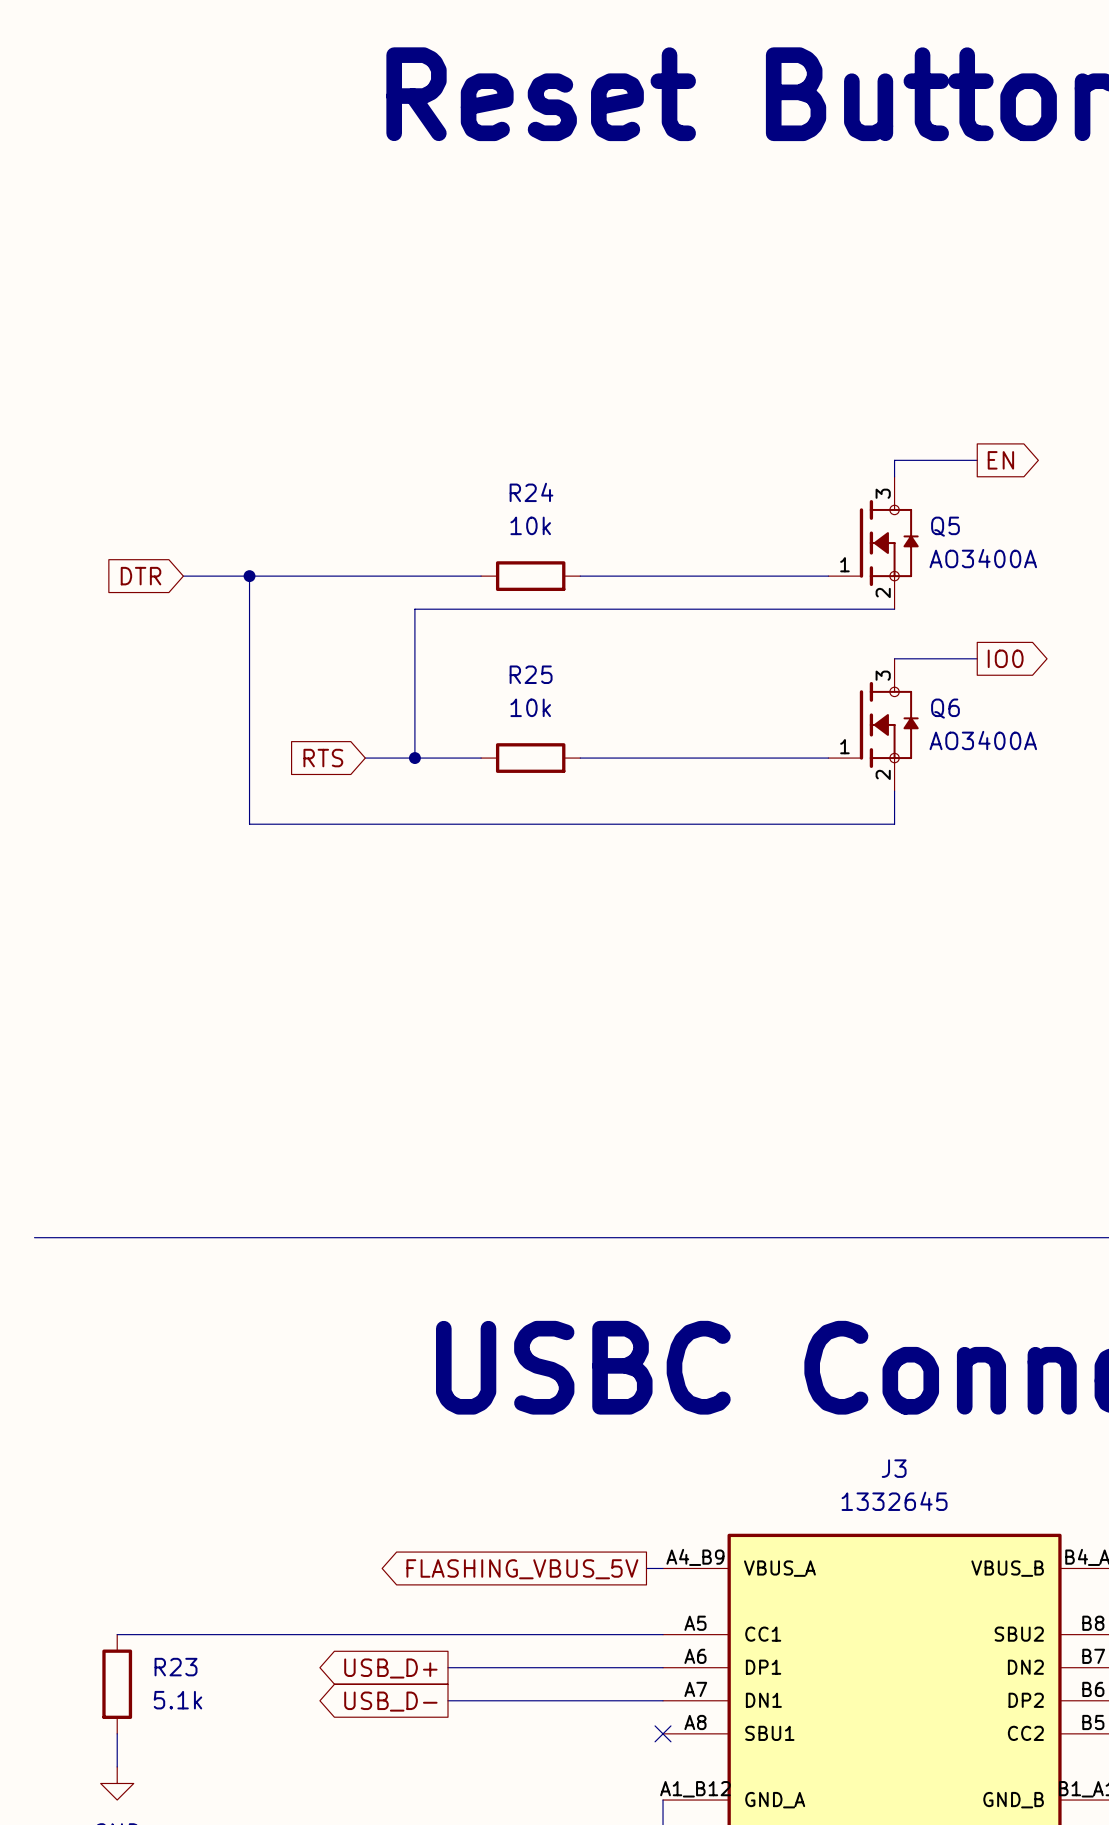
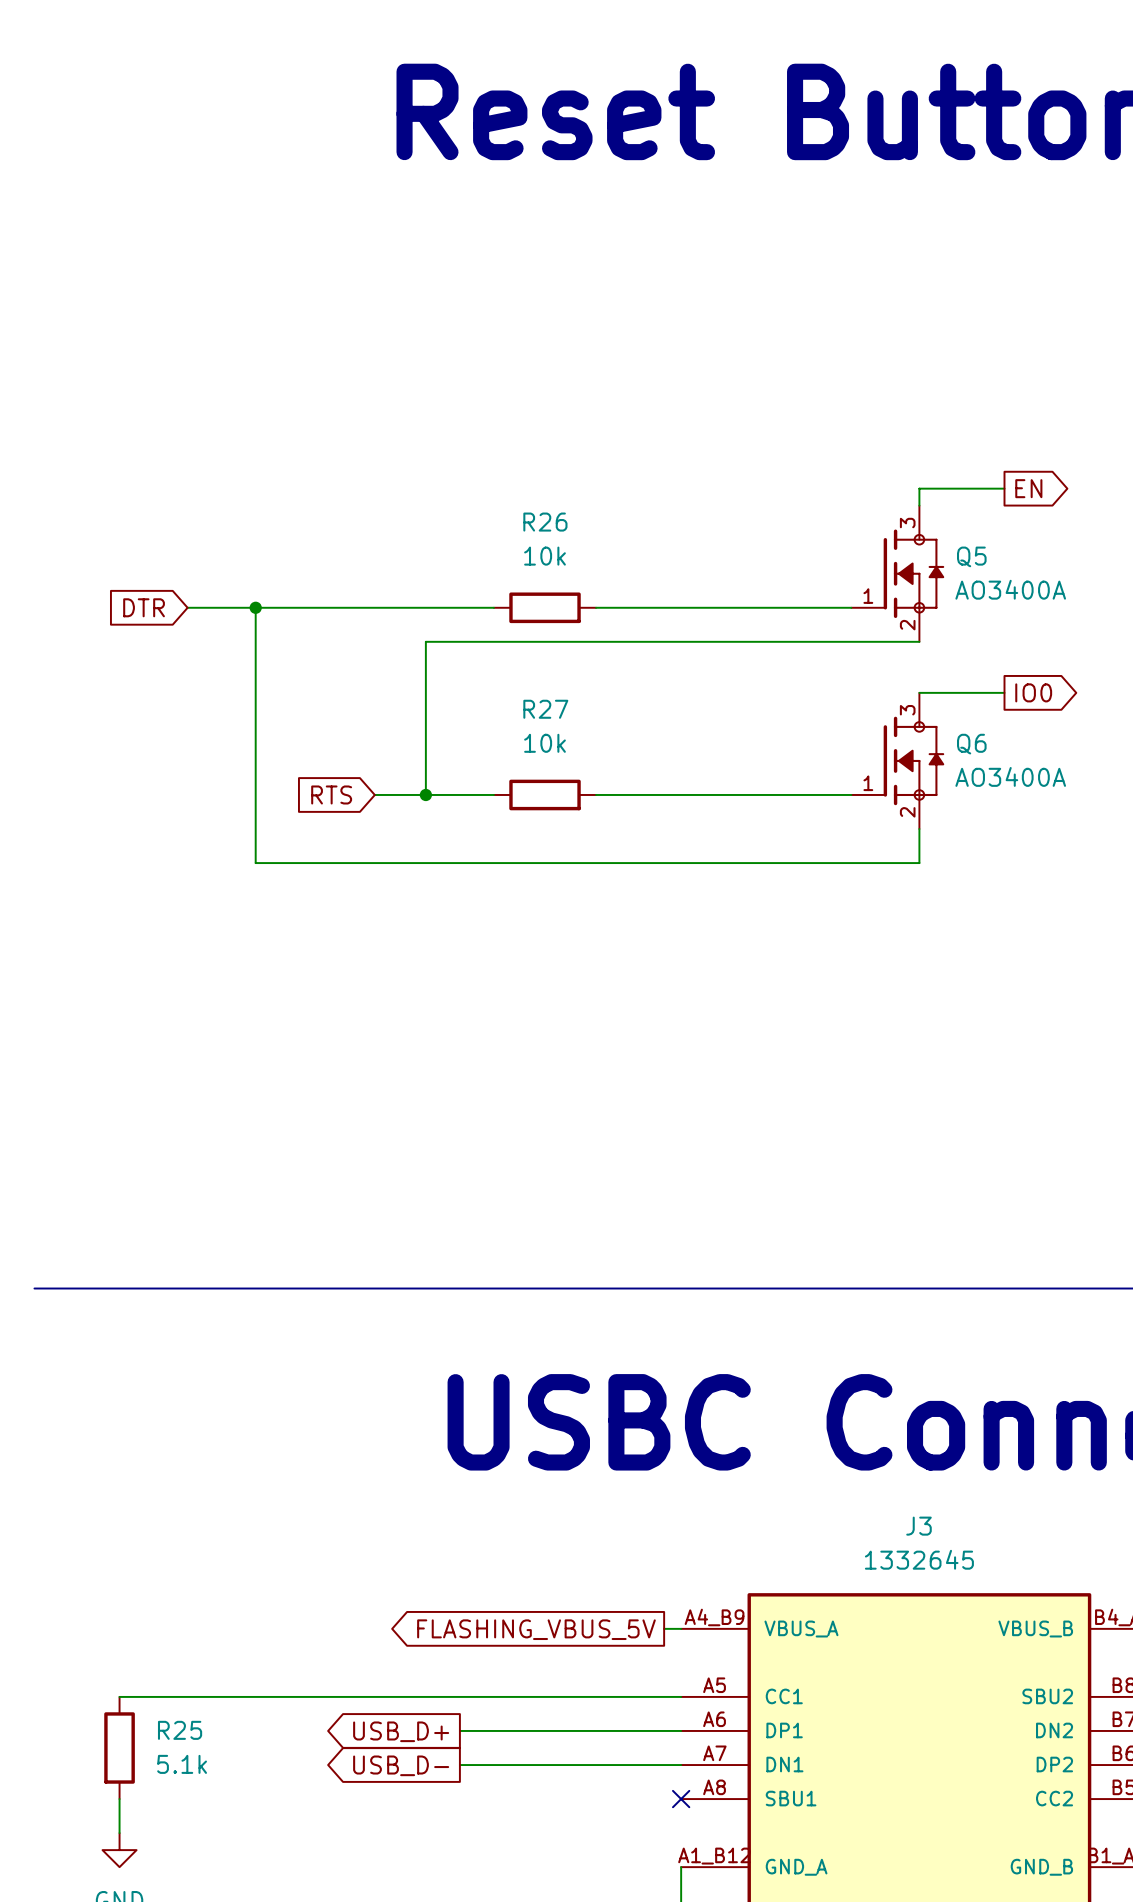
R24 name: R24 (531, 492) -> R26 (545, 522)
R25 name: R25 (531, 674) -> R27 (545, 709)
R23 name: R23 (176, 1667) -> R25 (180, 1730)

